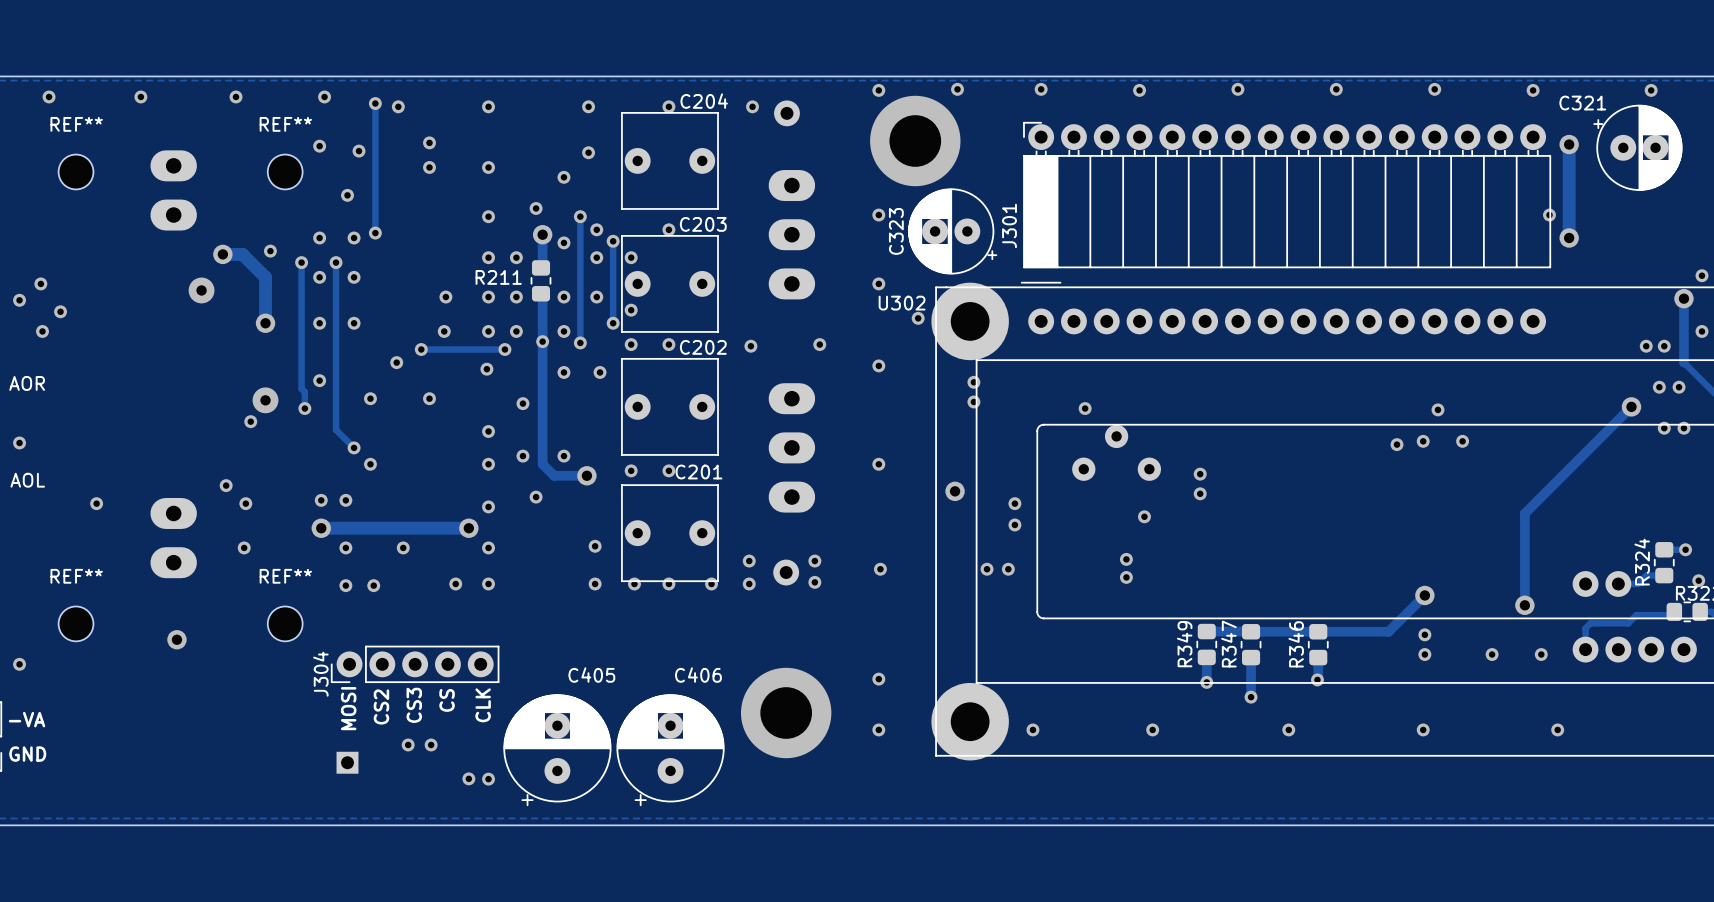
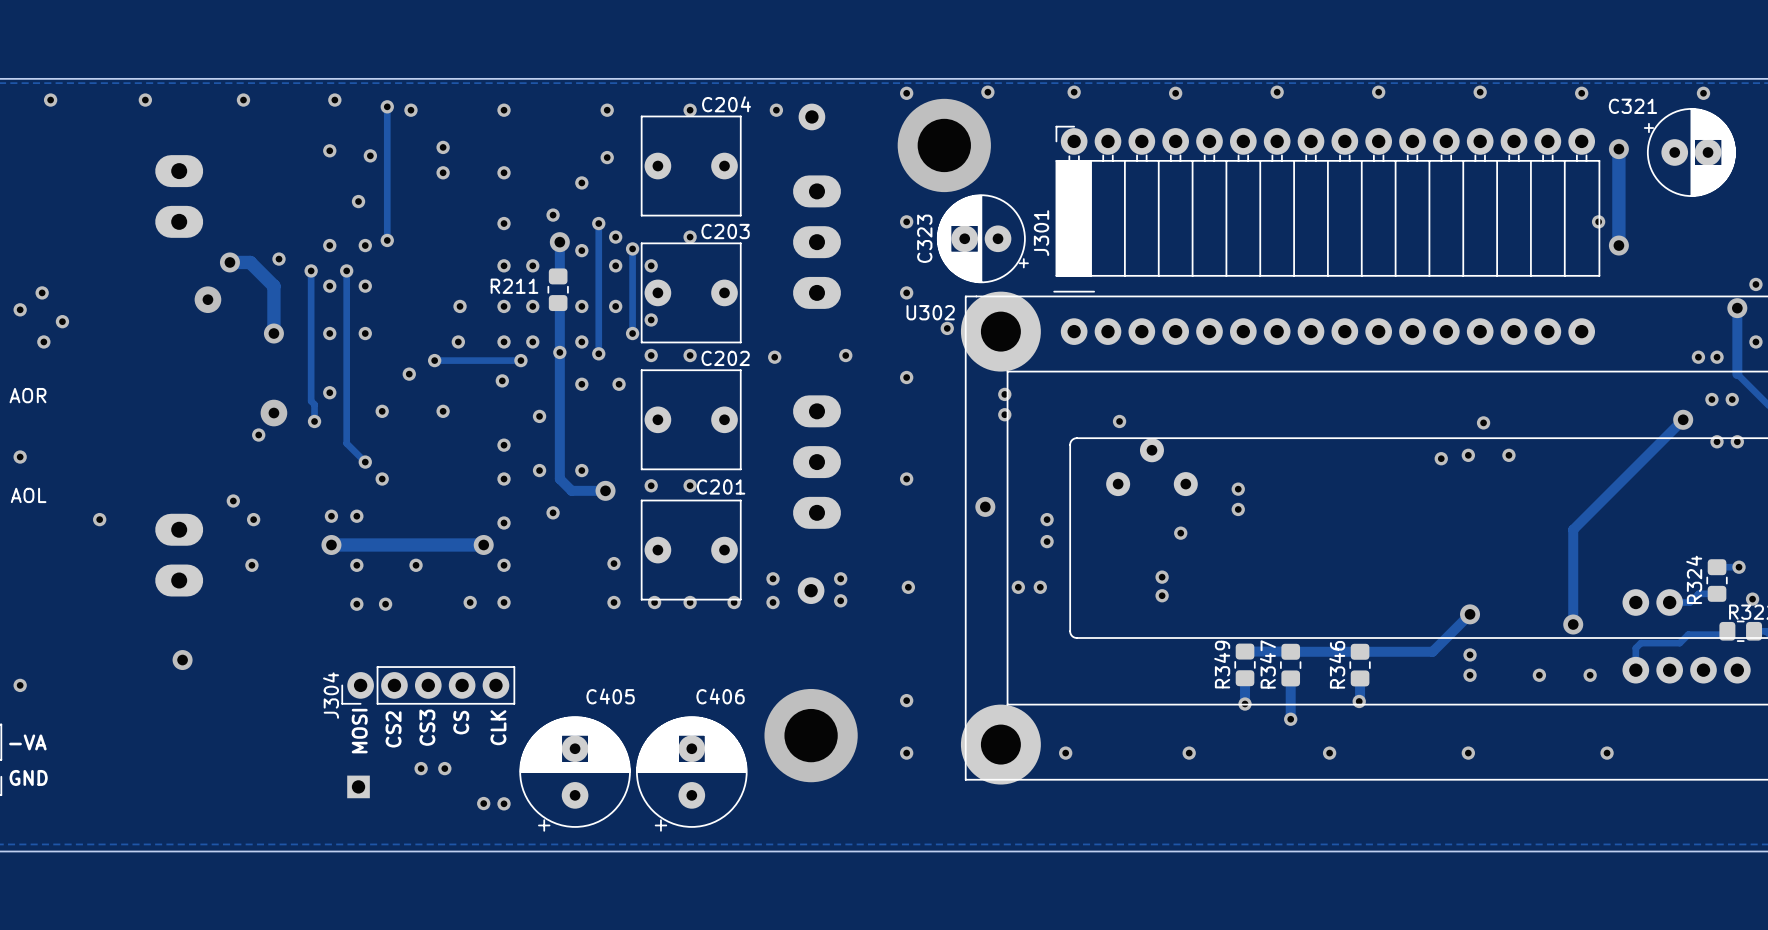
REF**: (76, 171) -> none
REF**: (285, 171) -> none
REF**: (76, 623) -> none
REF**: (285, 623) -> none

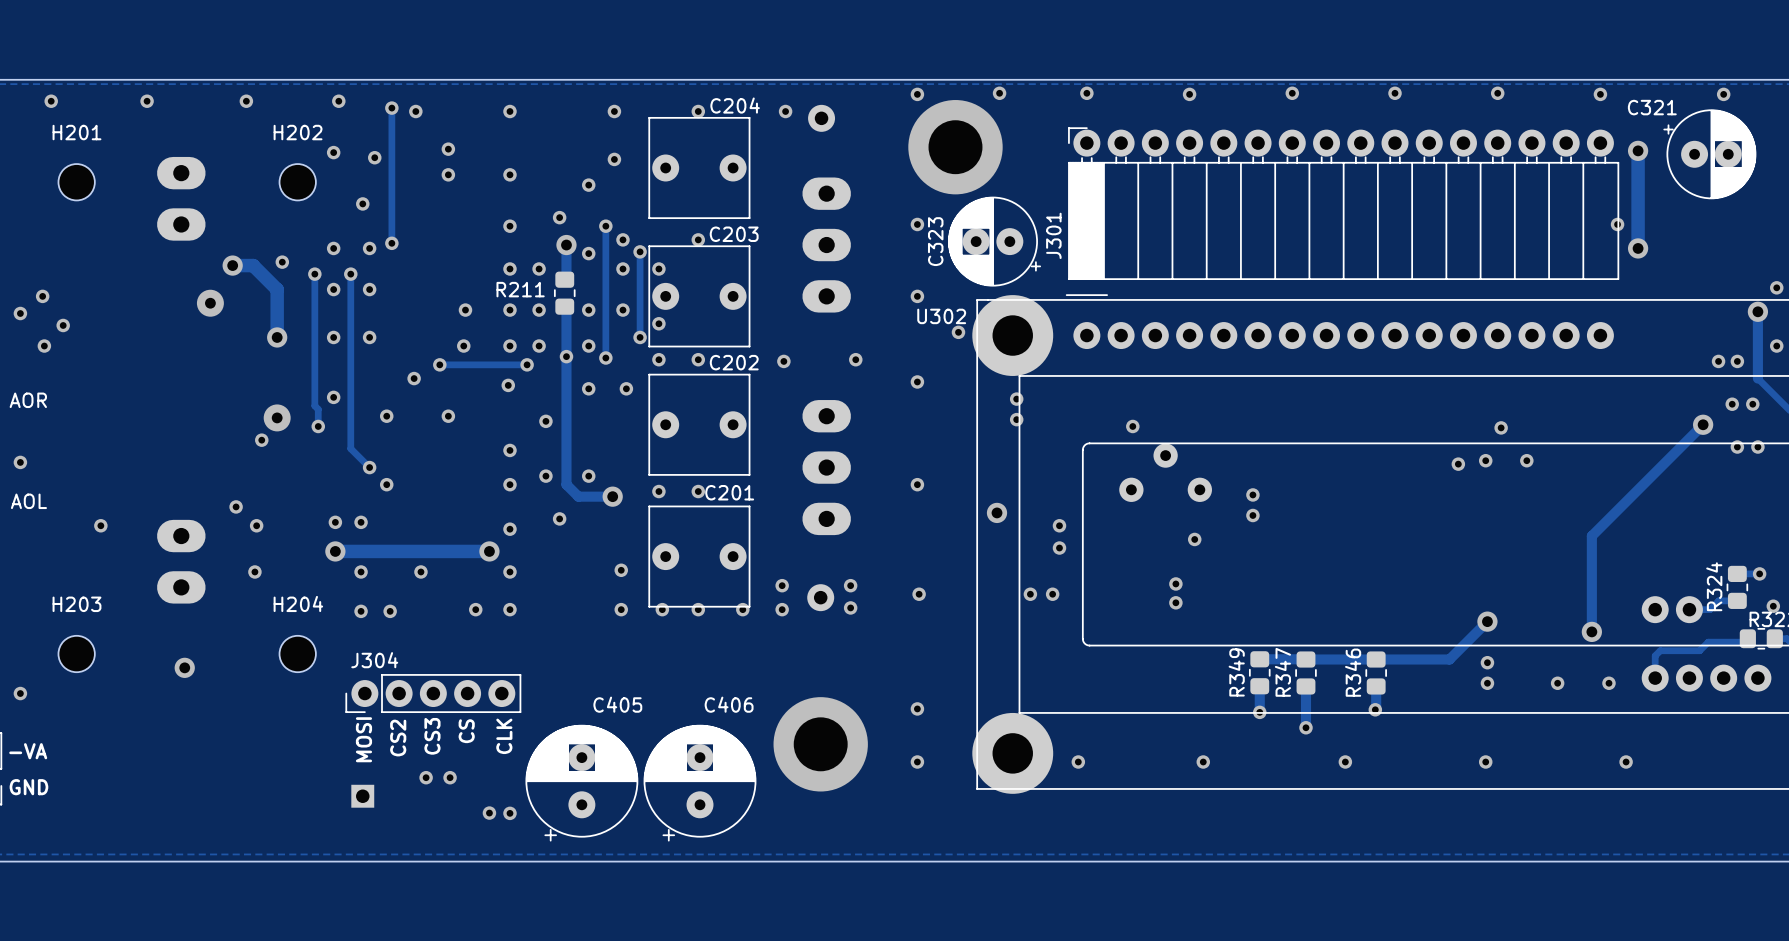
H201: none -> (76, 182)
H202: none -> (297, 182)
H203: none -> (76, 654)
H204: none -> (297, 654)
J304 name rotation: 0° (331, 695) -> 90° clockwise (374, 660)

